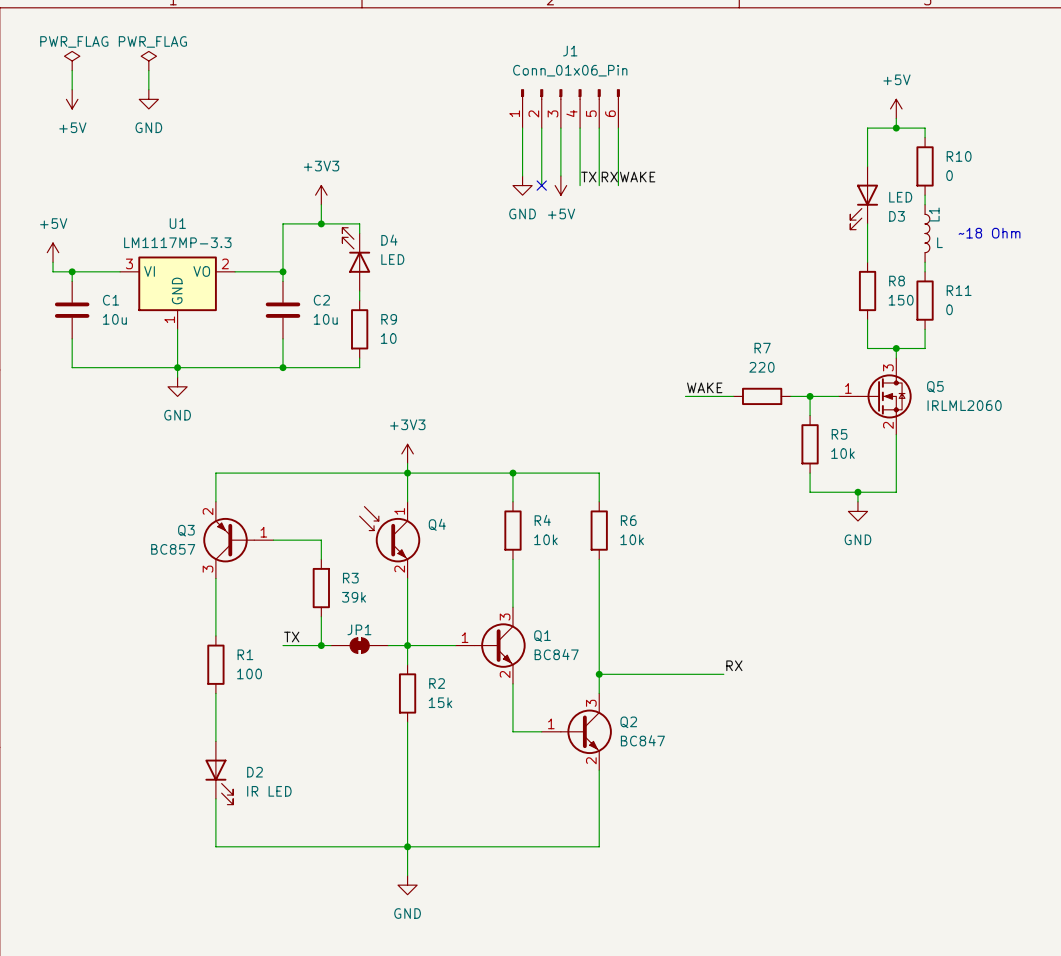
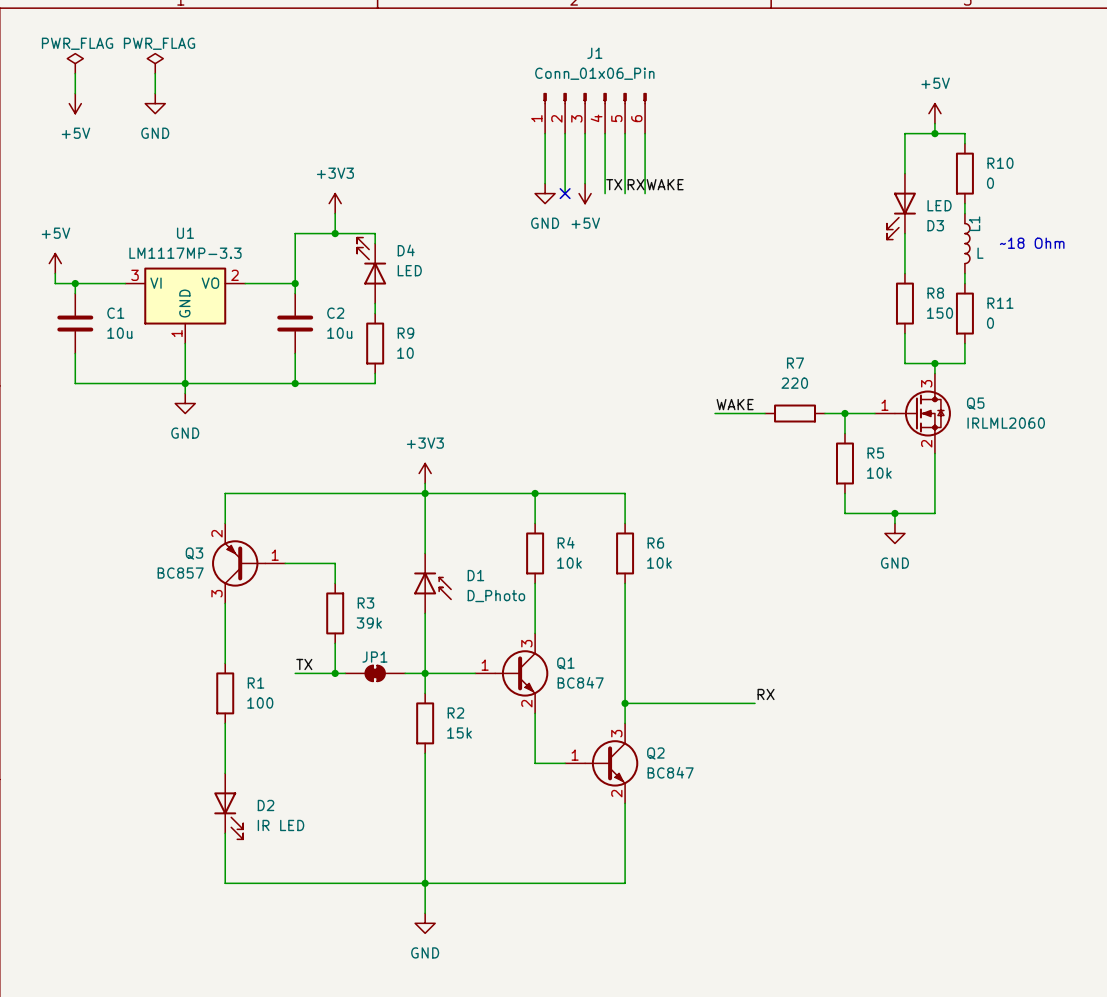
Q4: (389, 540) -> none
D1: none -> D_Photo (432, 583)

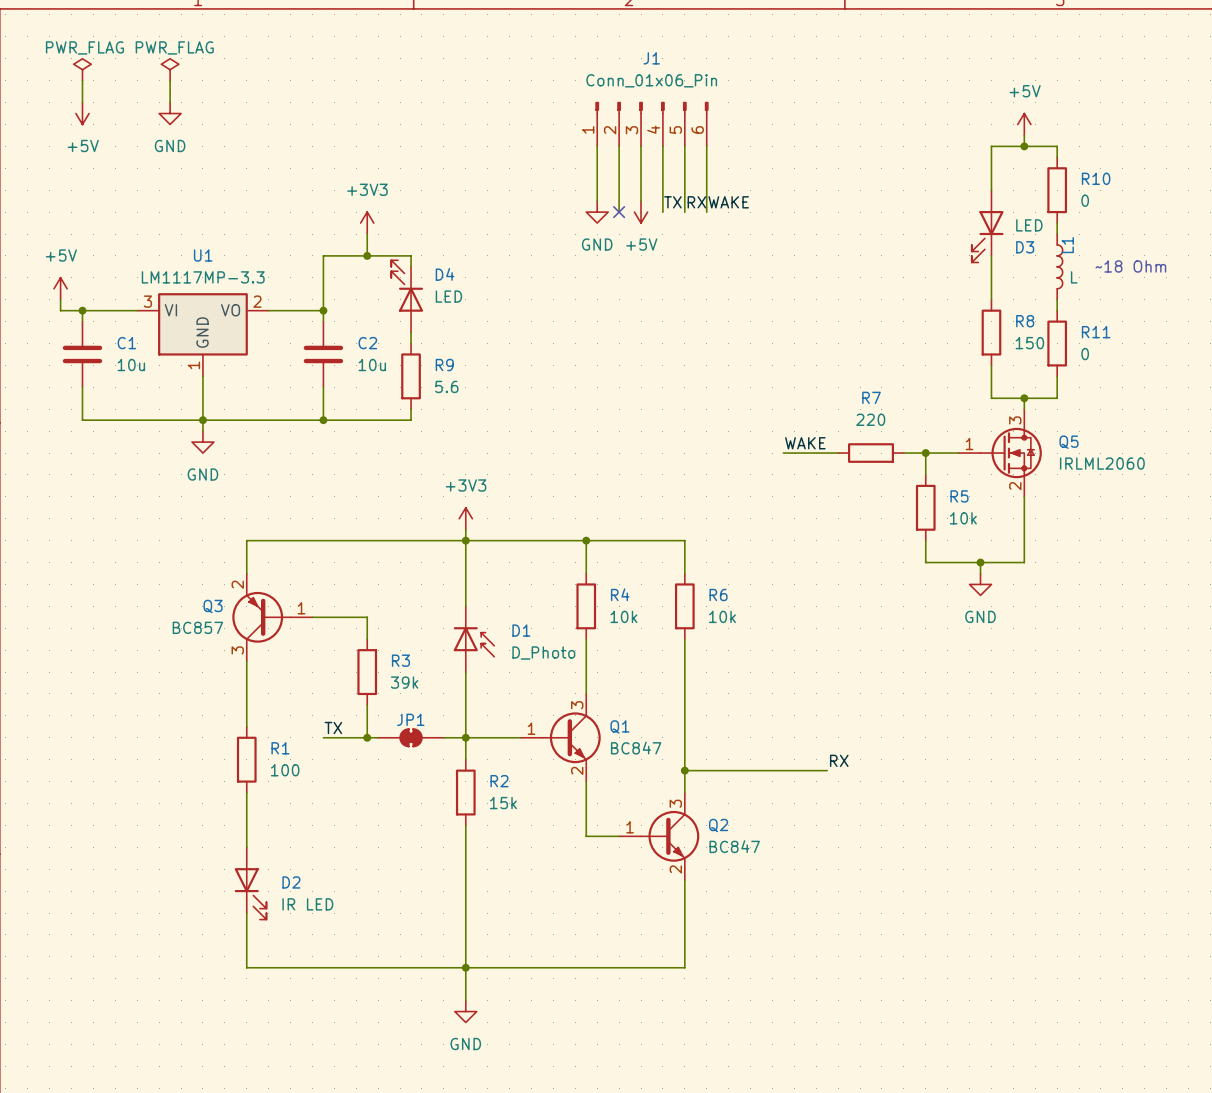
R9 value: 10 (405, 353) -> 5.6 (446, 386)

